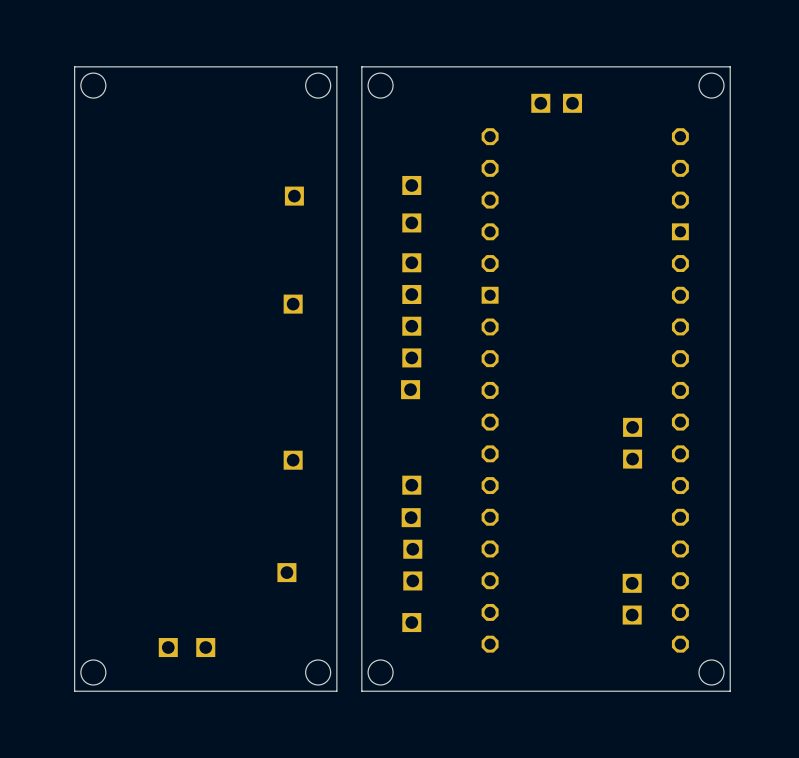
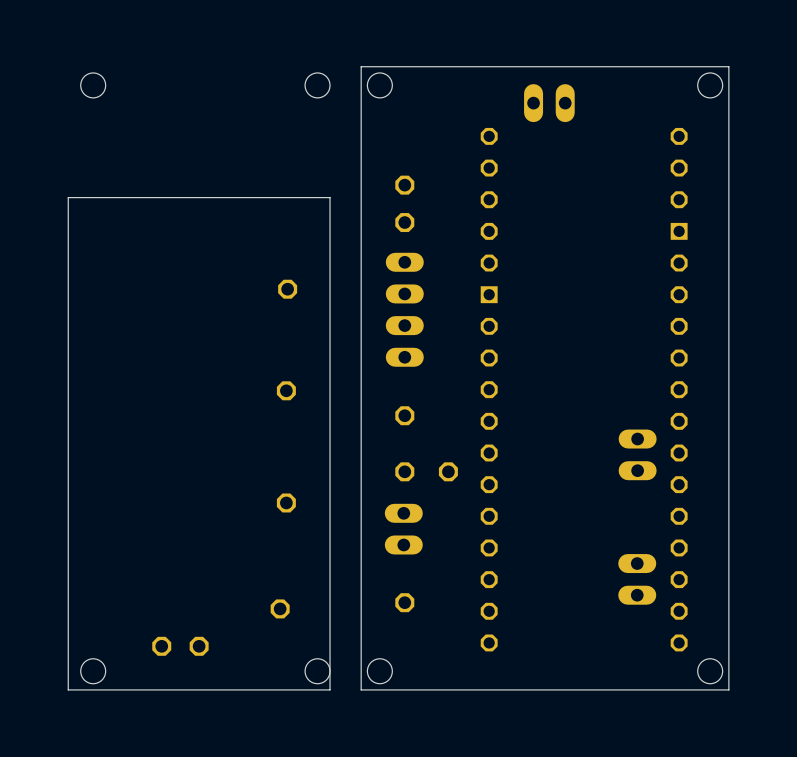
part footprint: [531, 93, 583, 113] -> [524, 84, 575, 123]
part footprint: [402, 175, 422, 195] -> [395, 175, 415, 195]
part: (294, 196) -> none
part footprint: [402, 213, 422, 233] -> [395, 213, 415, 233]
part footprint: [402, 253, 422, 368] -> [385, 252, 424, 367]
part: none -> (287, 289)
part: (293, 304) -> none
part: (410, 389) -> none
part: none -> (286, 390)
part: none -> (404, 415)
part: (632, 443) -> none
part: none -> (637, 454)
part: (293, 460) -> none
part: none -> (404, 471)
part: none -> (448, 471)
part: (411, 485) -> none
part: none -> (286, 502)
part: (411, 517) -> none
part: none -> (403, 529)
part: (412, 565) -> none
part: (286, 572) -> none
part: none -> (637, 579)
part: (632, 599) -> none
part: none -> (404, 602)
part: none -> (280, 608)
part: (411, 622) -> none
part footprint: [158, 638, 178, 658] -> [152, 636, 172, 656]
part footprint: [196, 638, 216, 658] -> [189, 636, 209, 656]
board edge: (330, 691) (336, 691) (336, 66) (74, 66) (74, 691) -> (330, 689) (330, 197) (68, 197) (68, 689) (74, 689)

